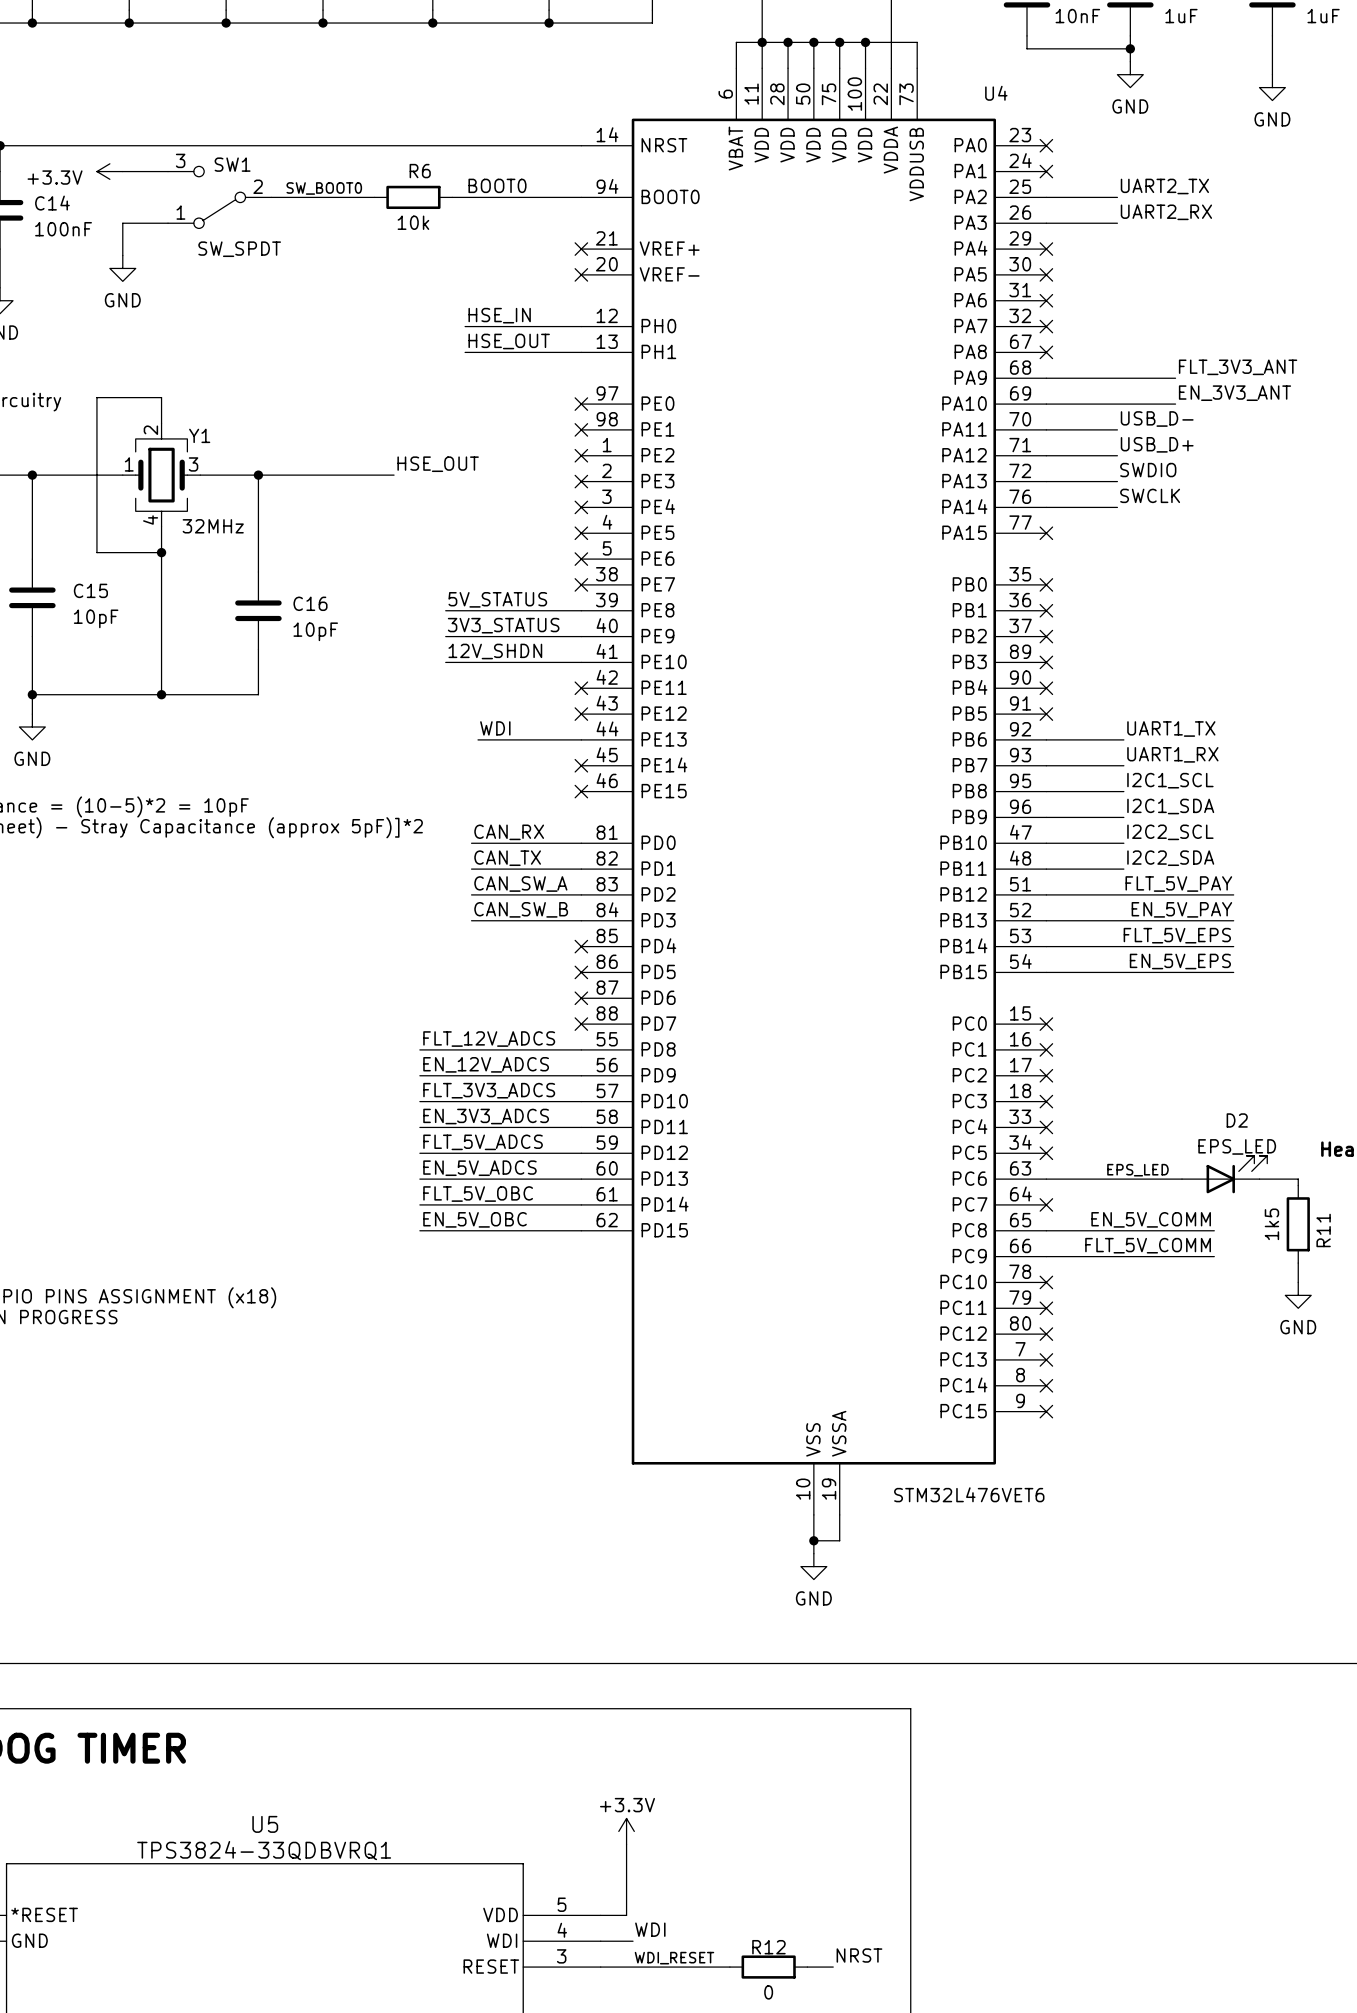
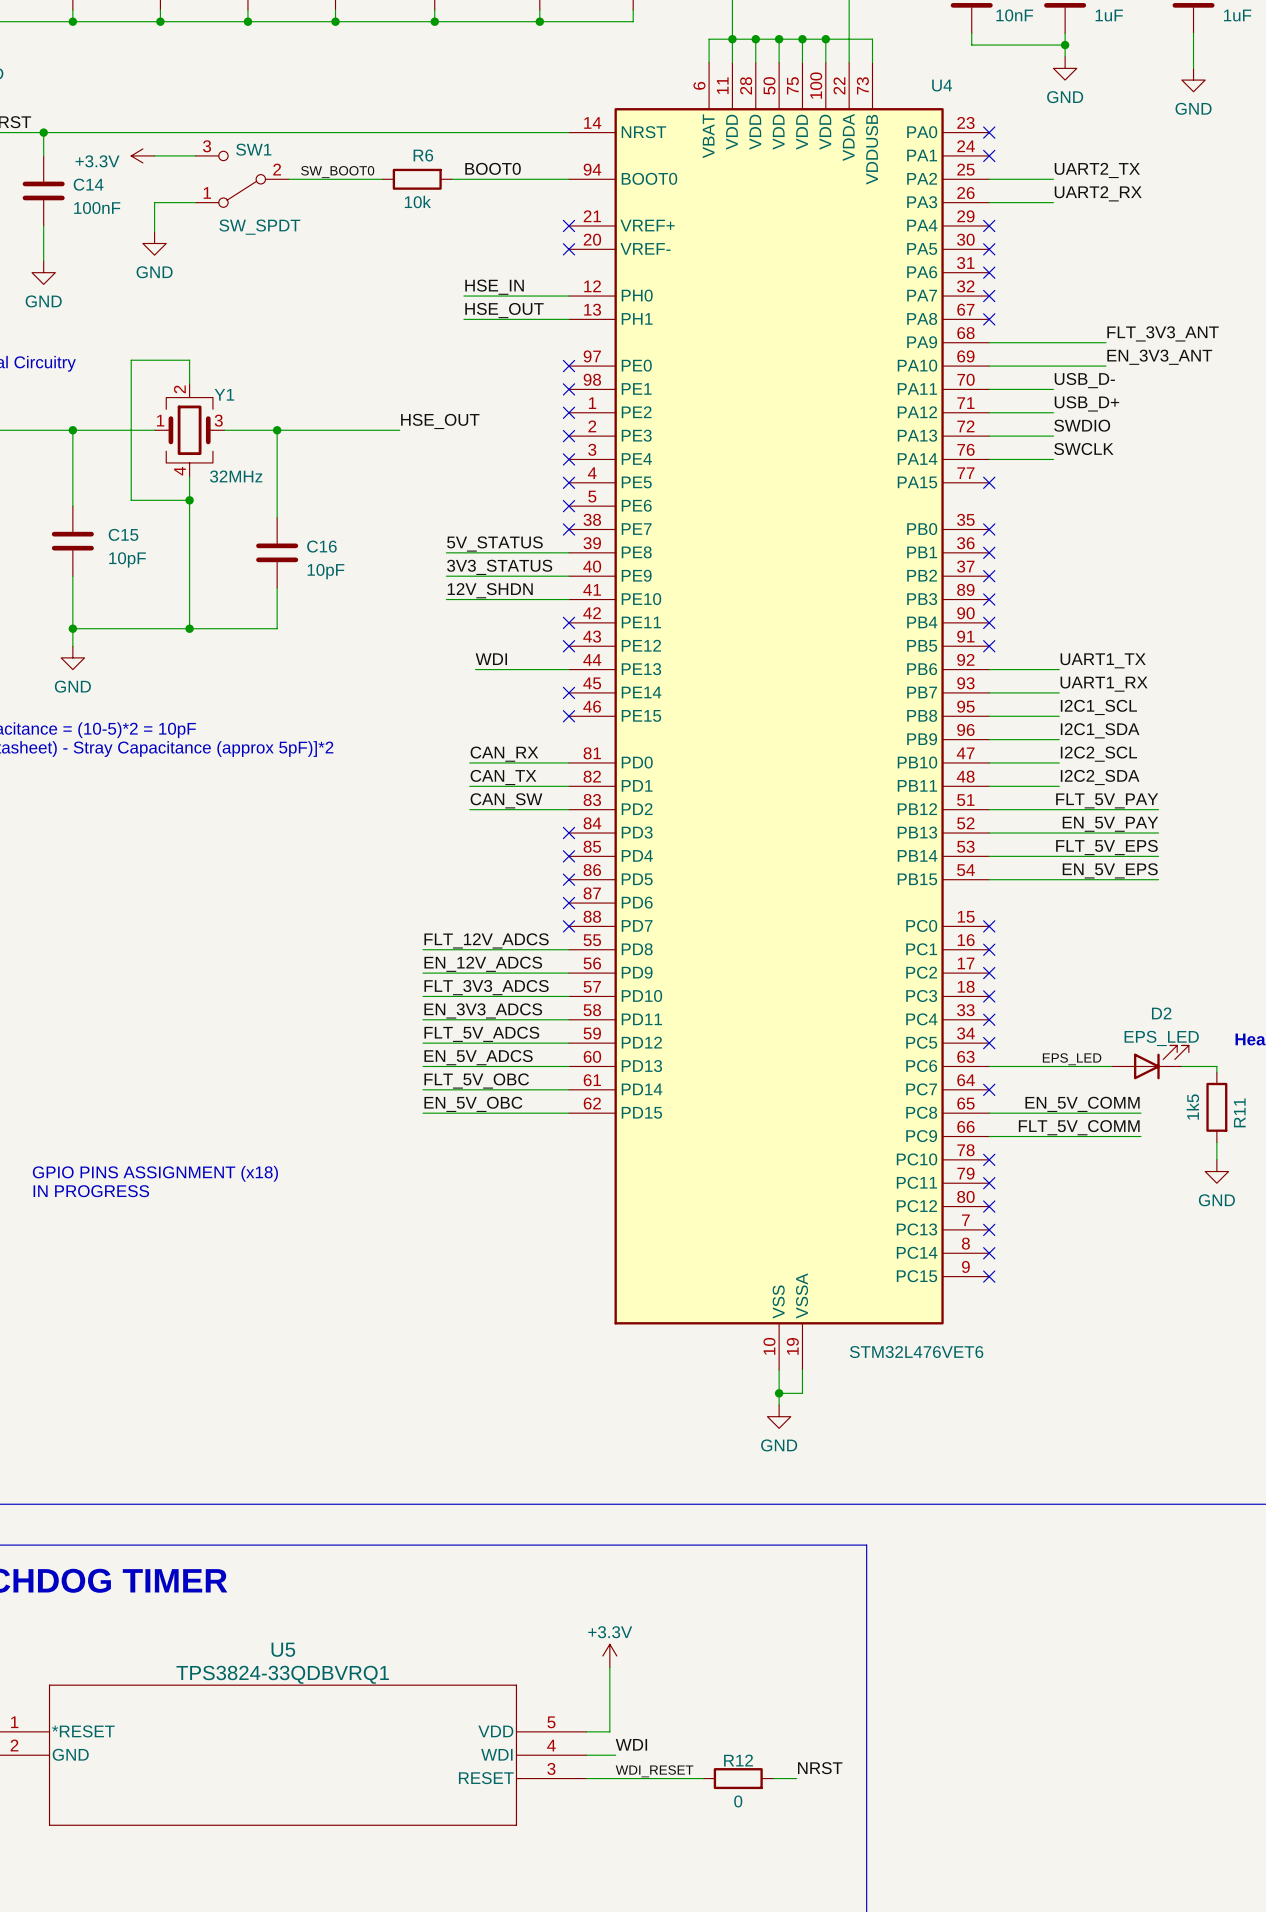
label: CAN_SW_A (520, 884) -> CAN_SW (506, 800)
label: CAN_SW_B (521, 909) -> none
wire: (471, 920) (581, 920) -> none
no-connect mark: none -> (568, 833)

